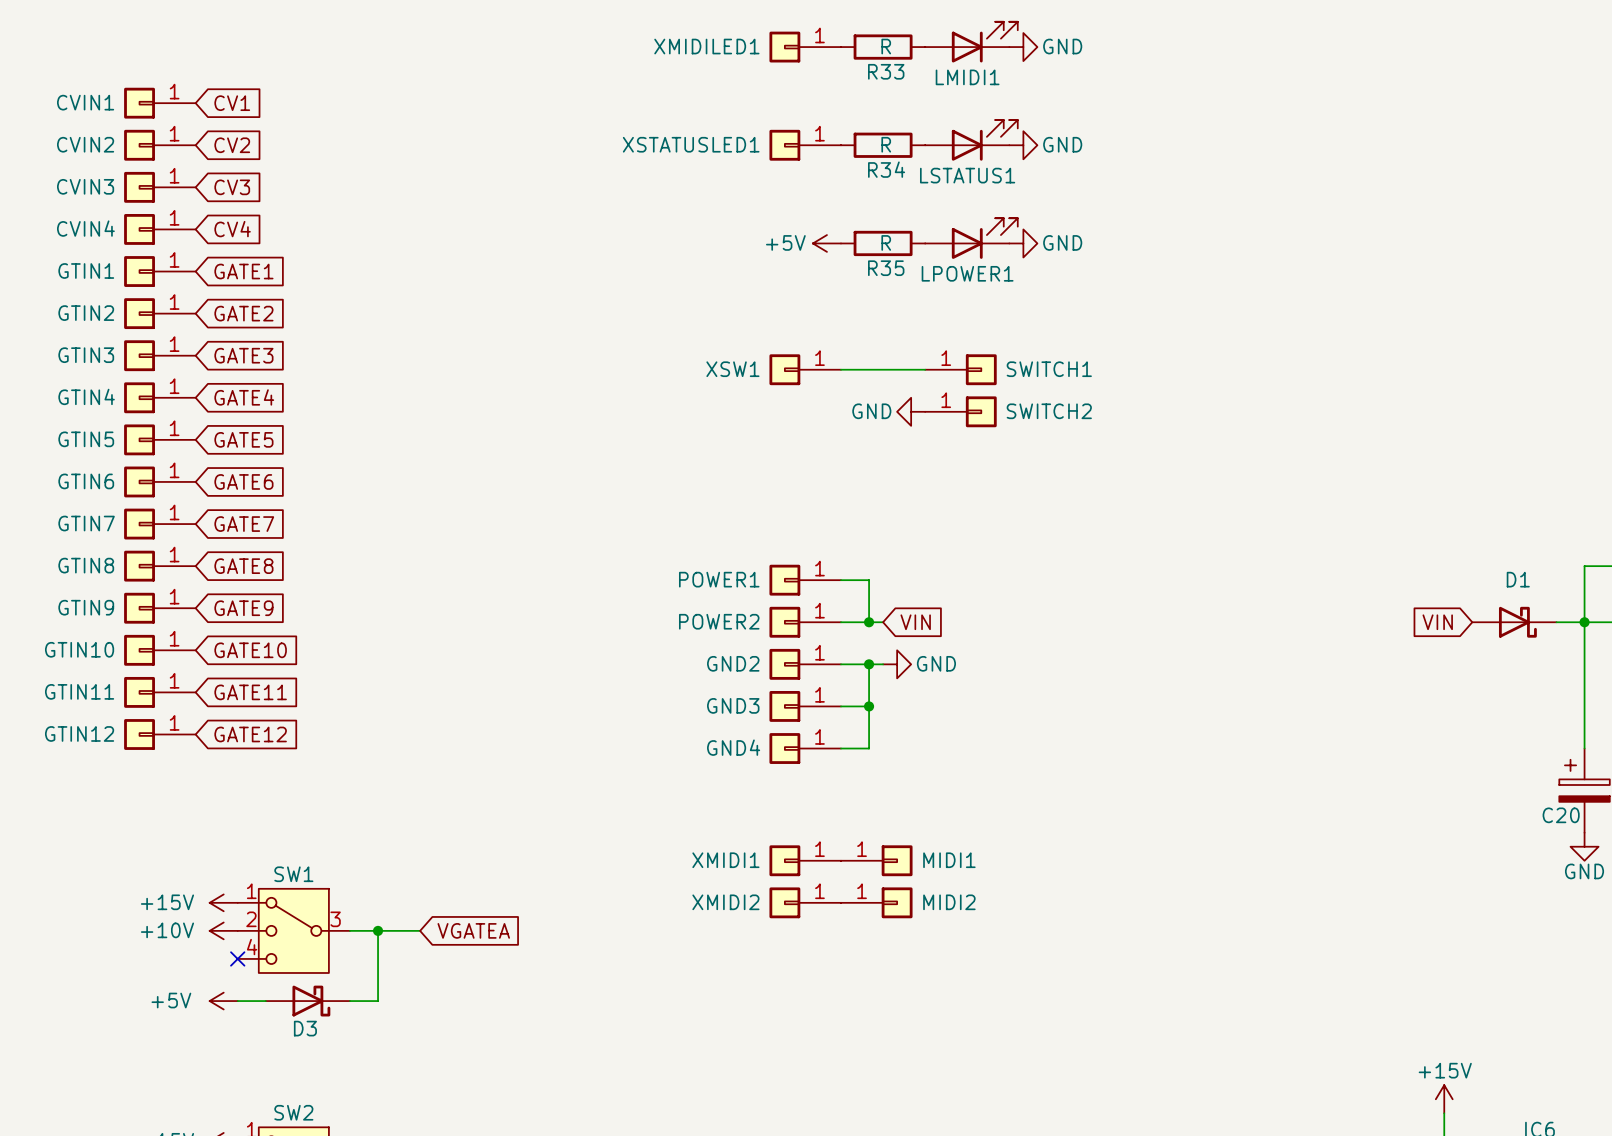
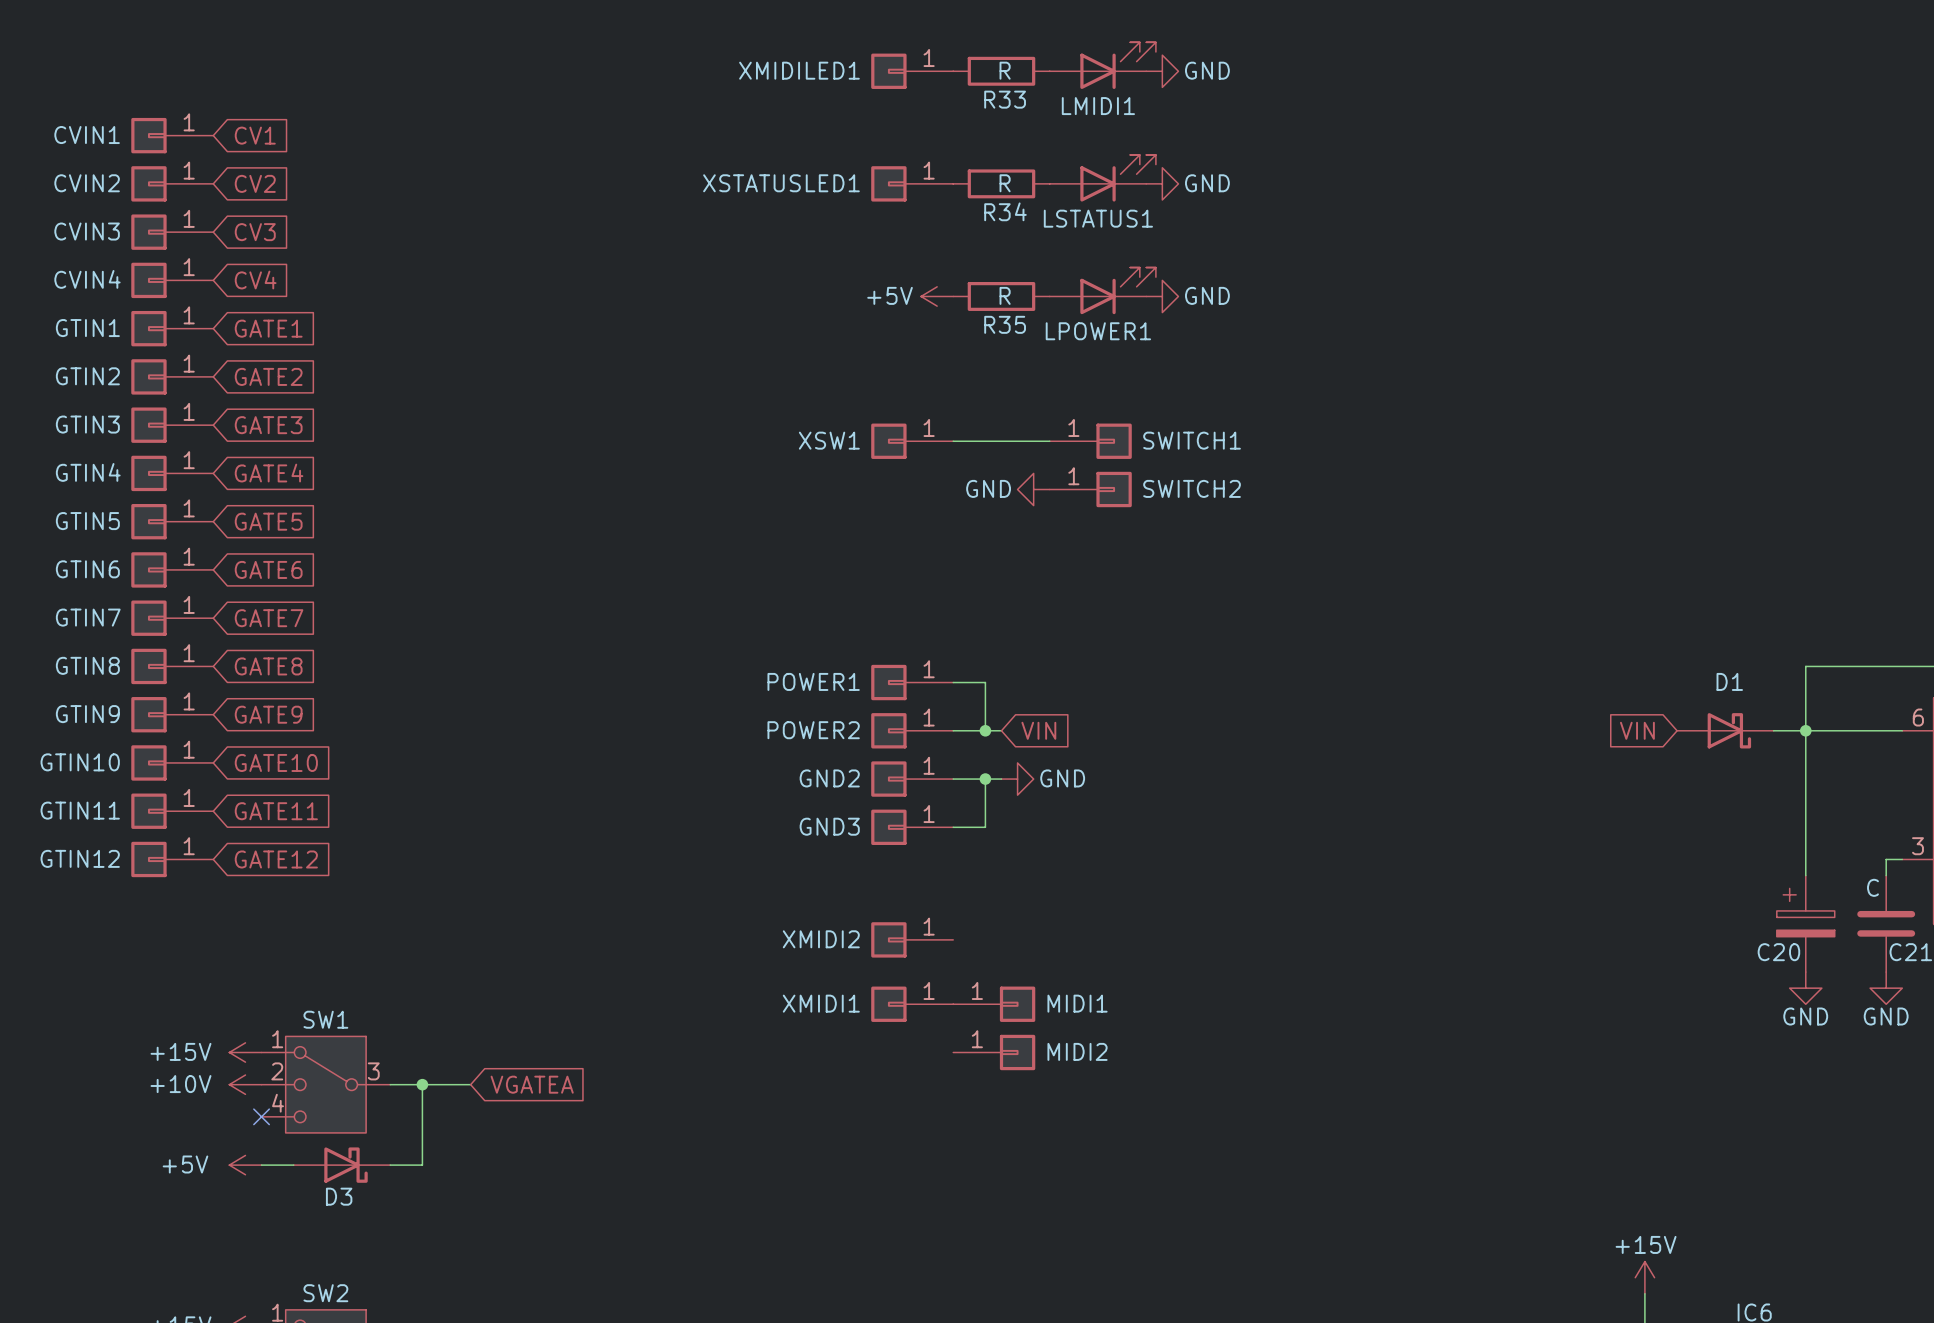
wire: (869, 706) (869, 748) (840, 748) -> none
junction: (869, 706) -> none
GND4: (805, 748) -> none
XMIDI2 position: (805, 902) -> (912, 939)

